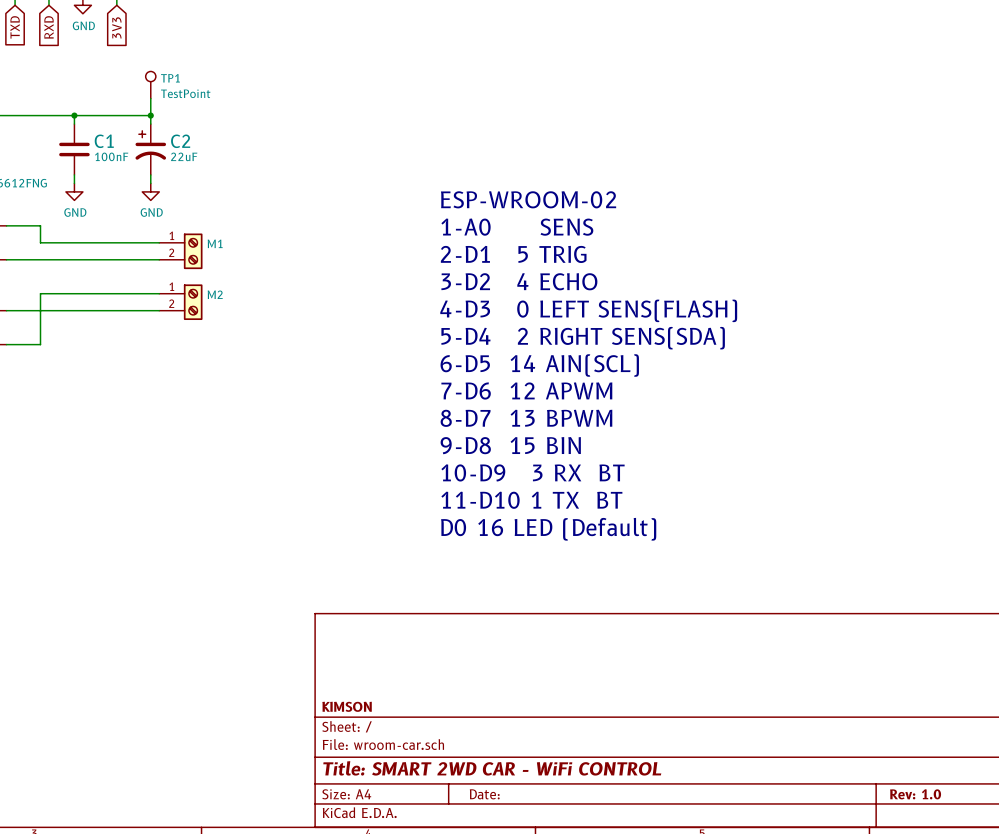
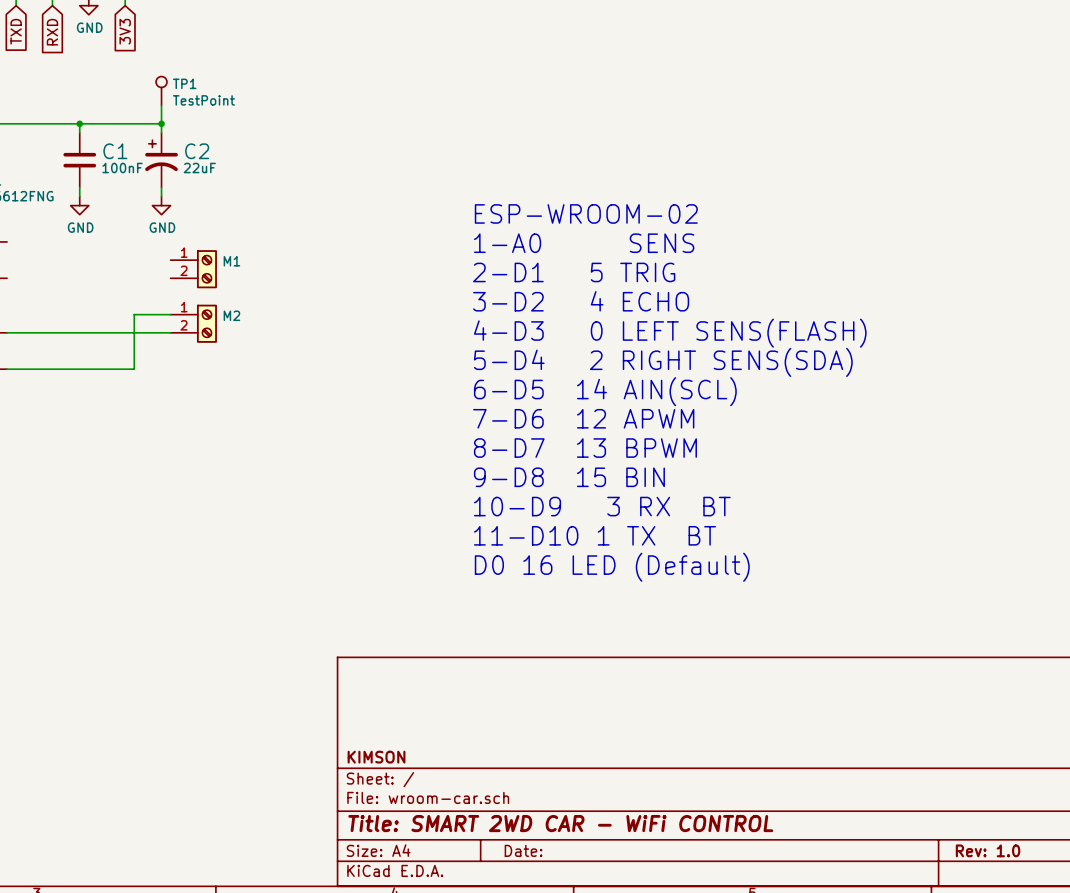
wire: (6, 225) (40, 225) (40, 242) (159, 242) -> none
wire: (6, 259) (159, 259) -> none
wire: (125, 293) (40, 293) (40, 344) -> (134, 314) (134, 369) (43, 369)

